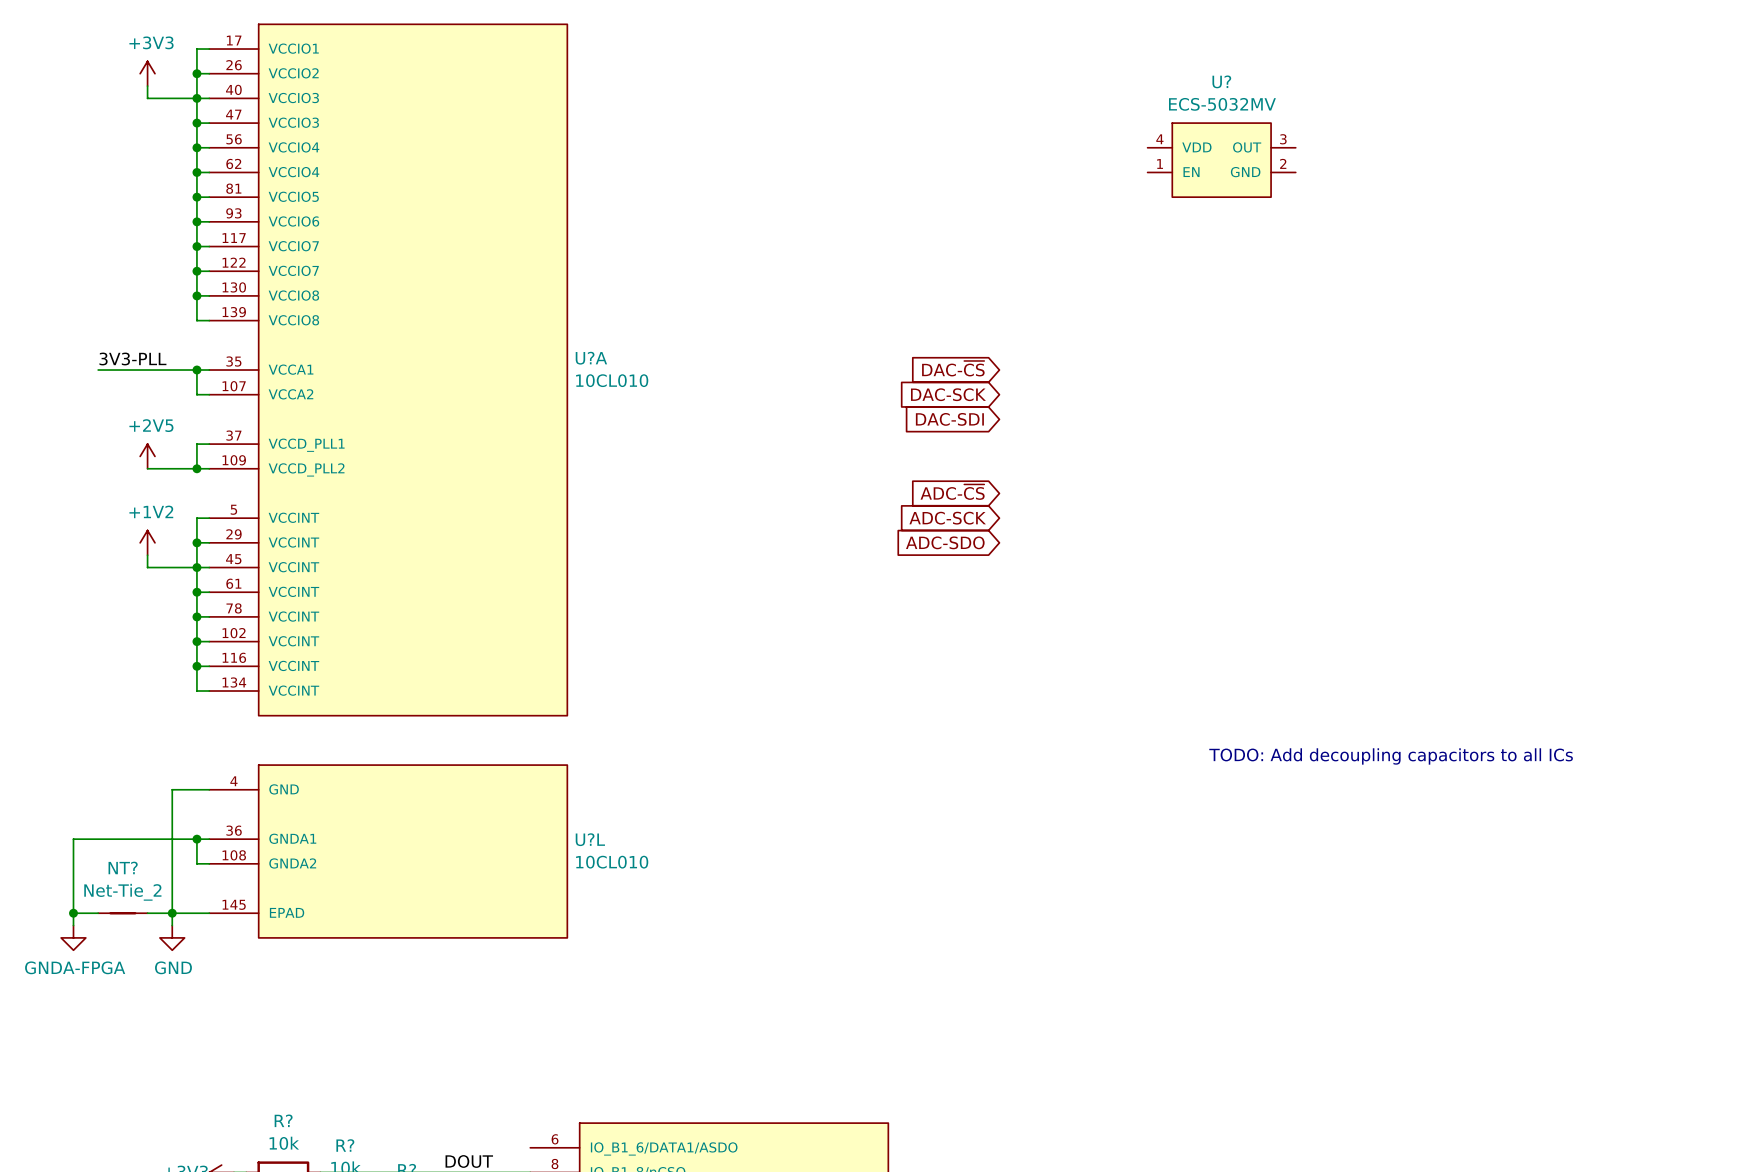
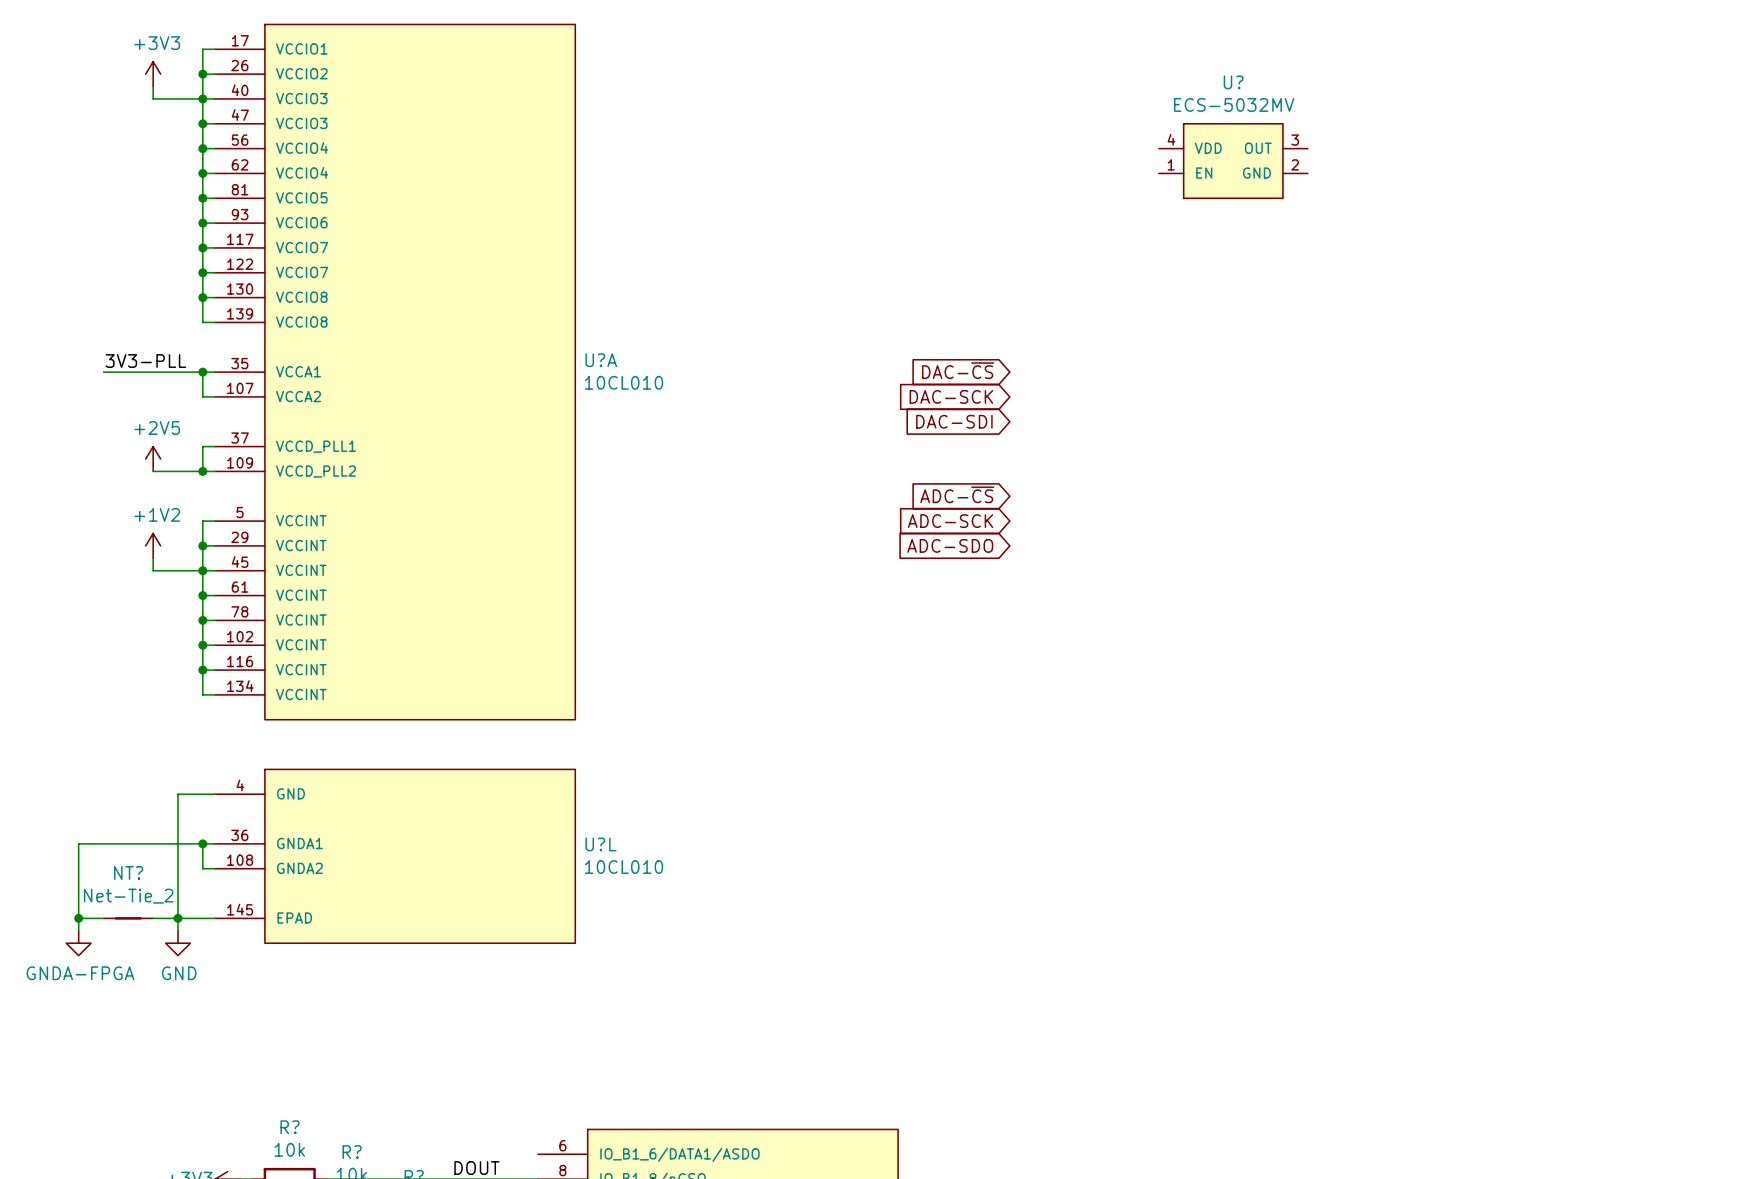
text: TODO: Add decoupling capacitors to all ICs (1391, 756) -> none

